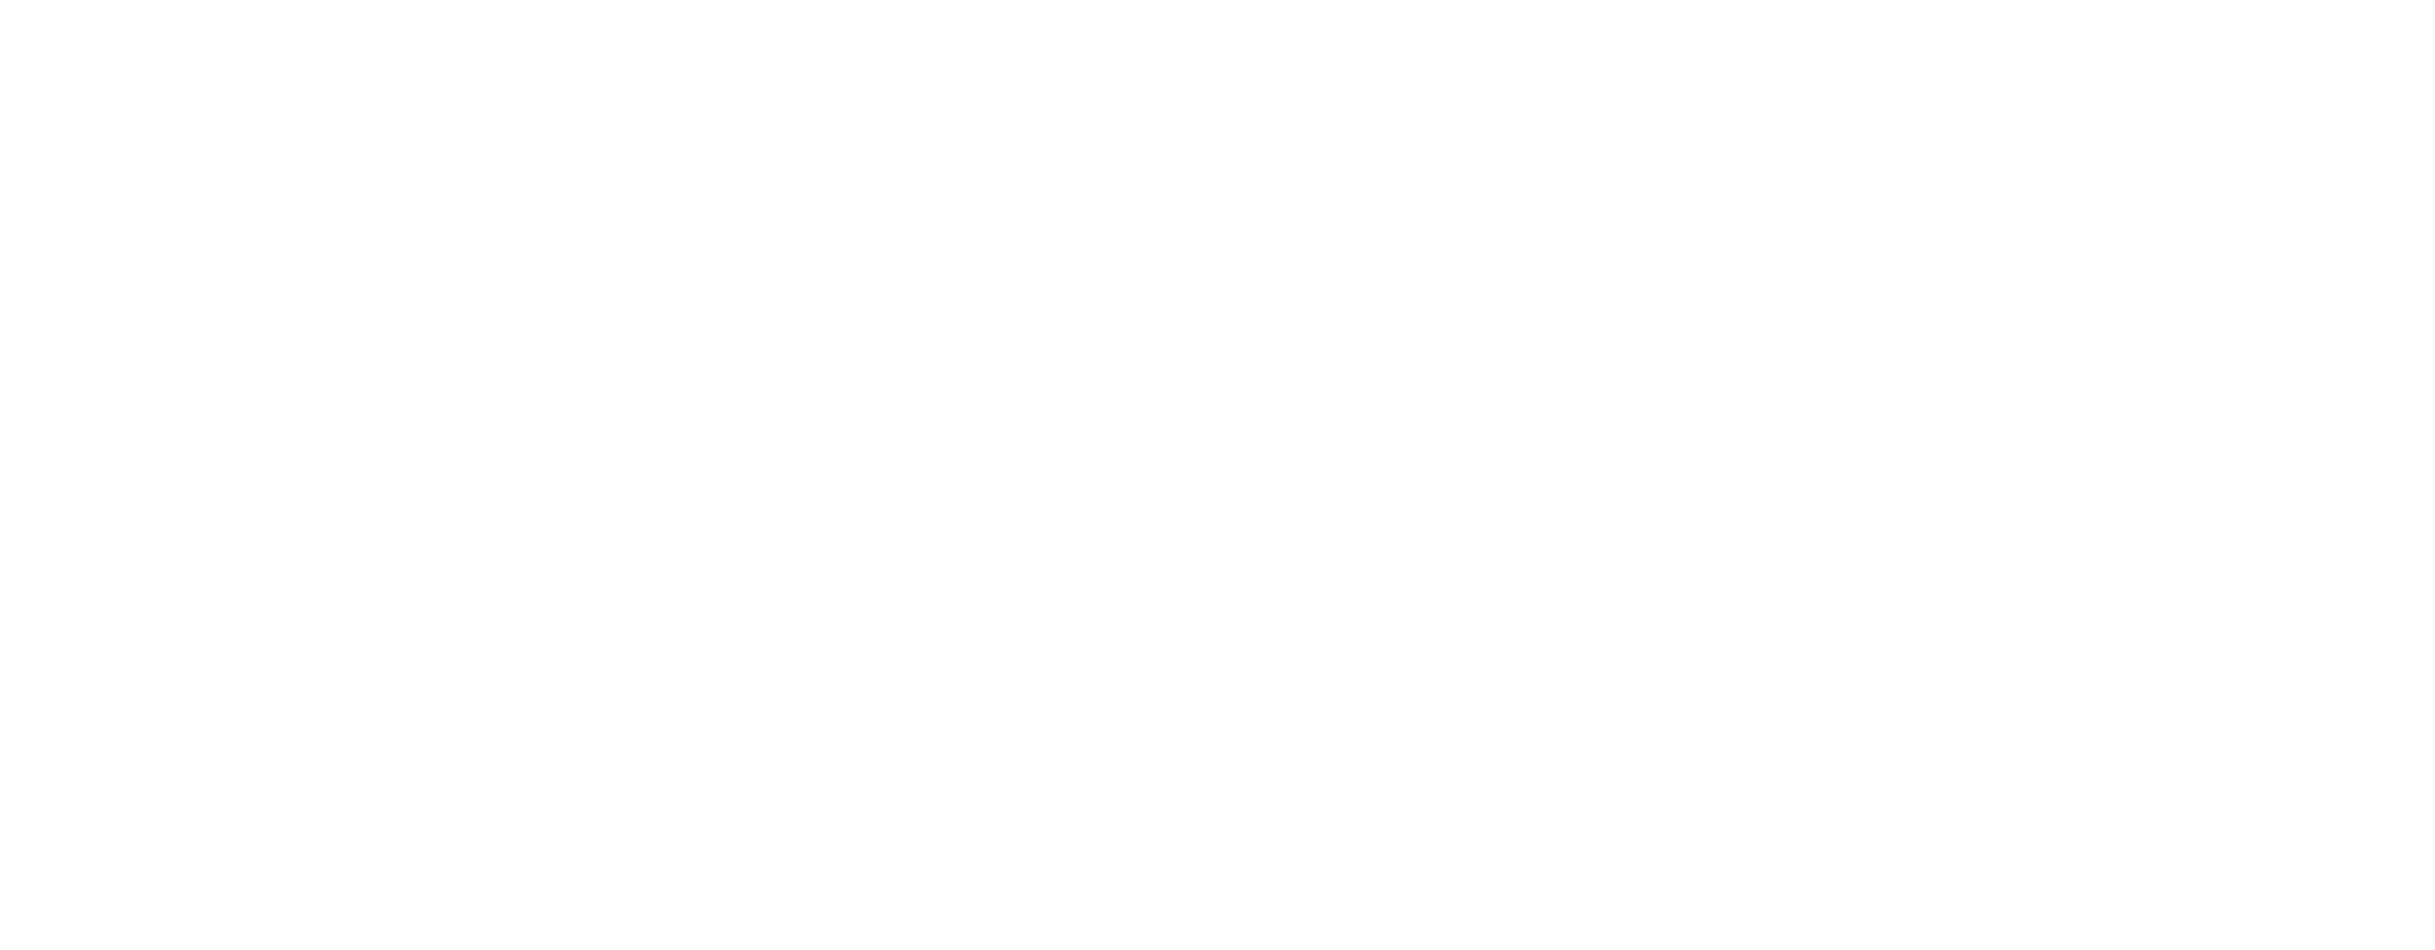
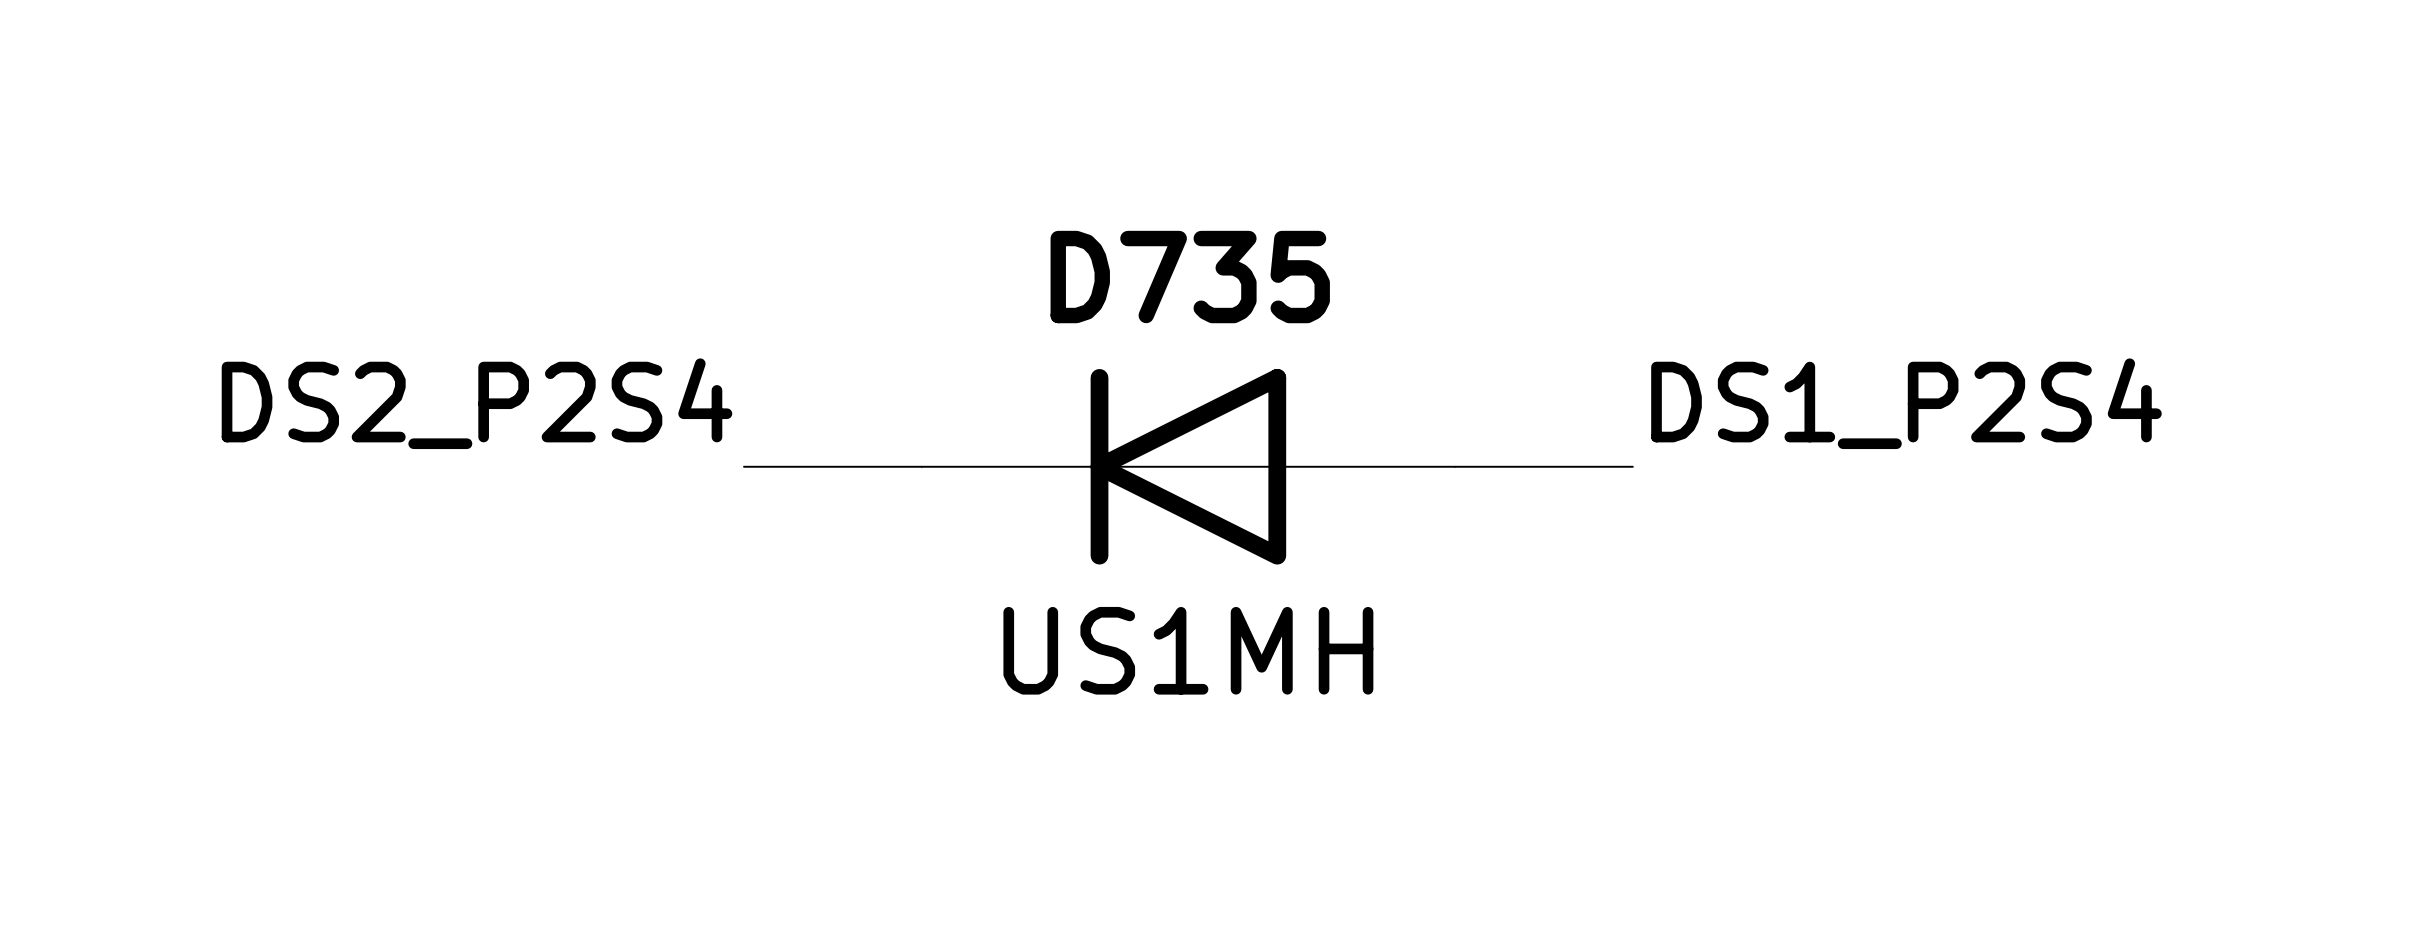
label: none -> DS2_P2S4 (476, 403)
label: none -> DS1_P2S4 (1906, 403)
wire: none -> (743, 466) (921, 466)
D735: none -> US1MH (1188, 466)
wire: none -> (1455, 466) (1632, 466)

